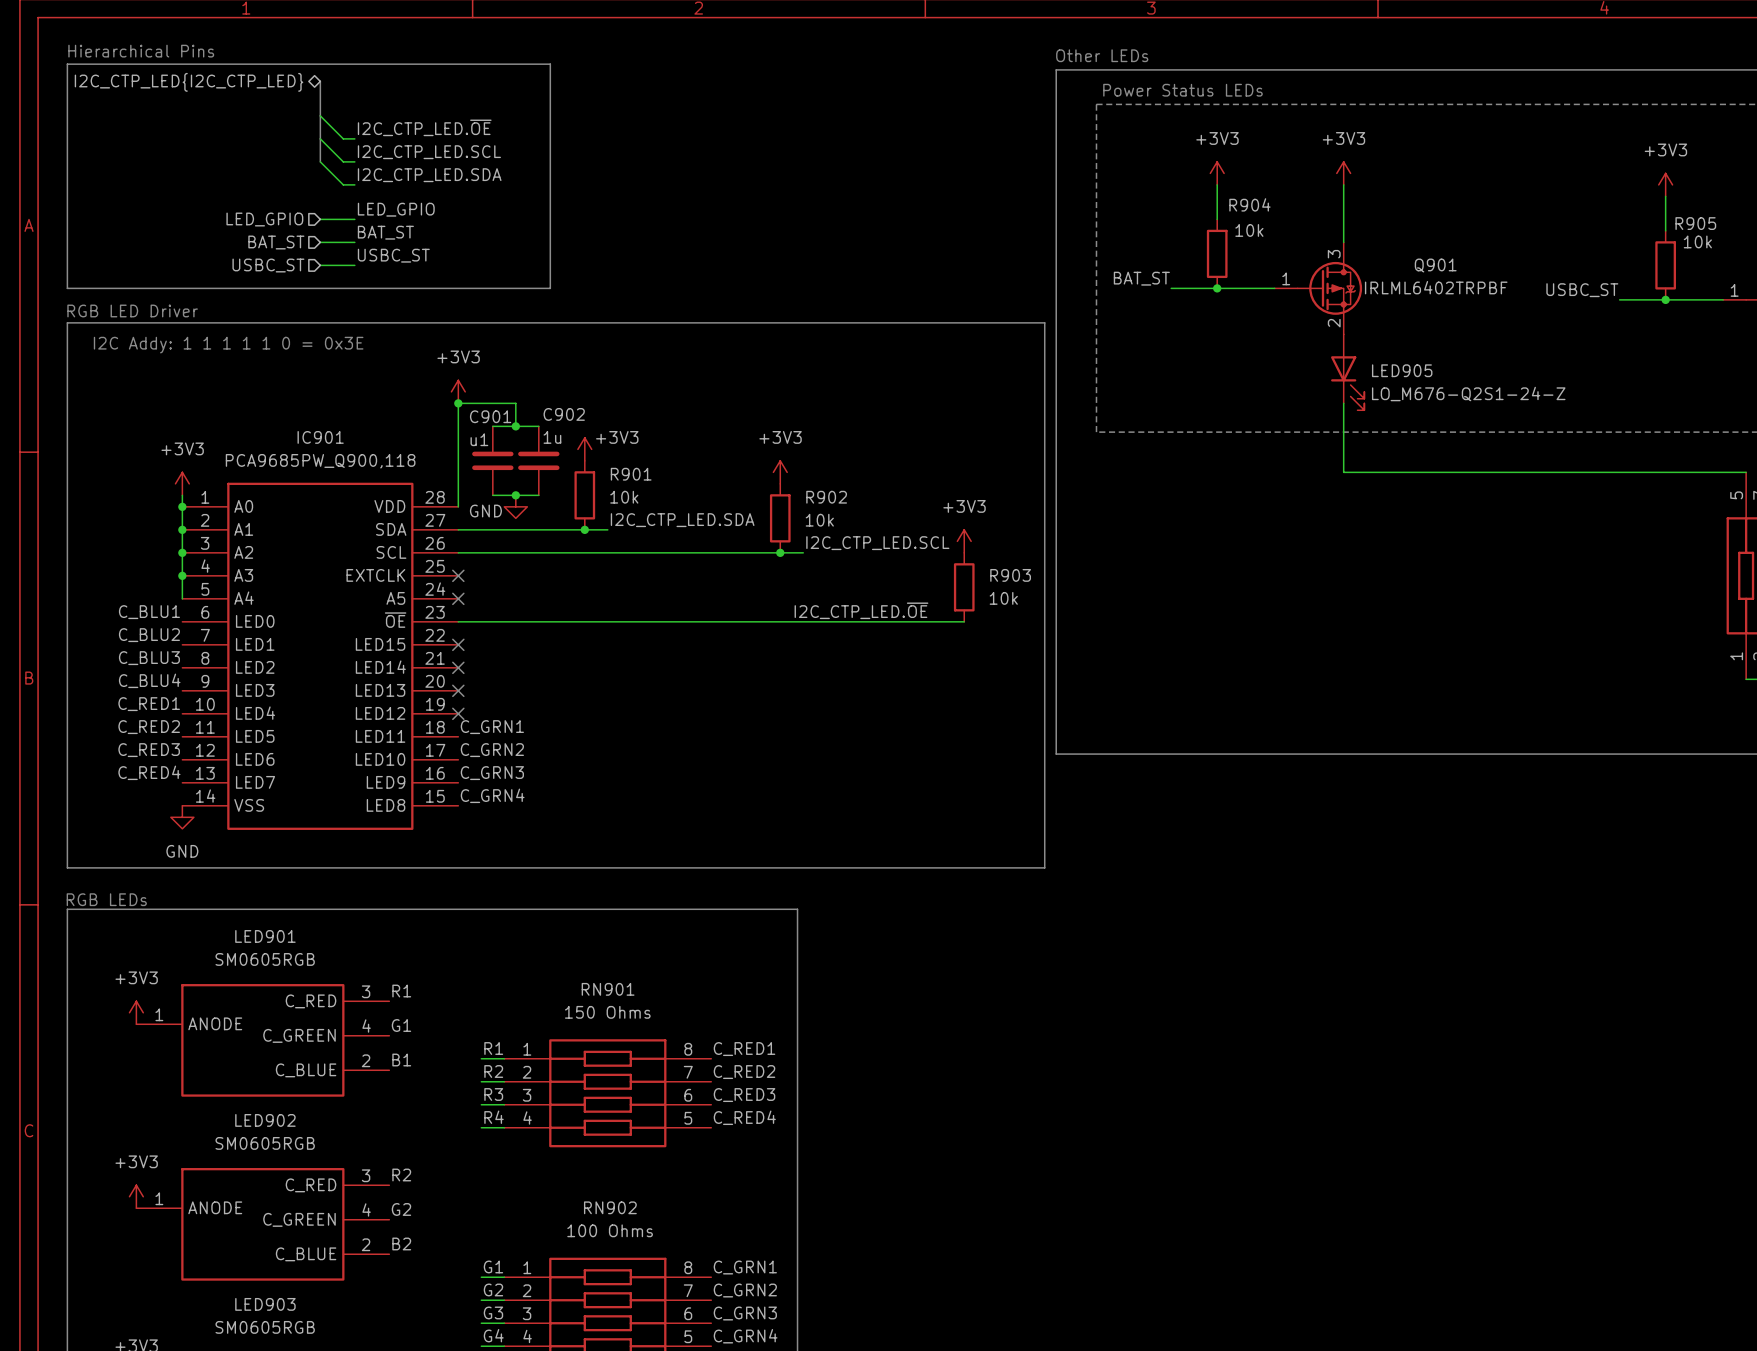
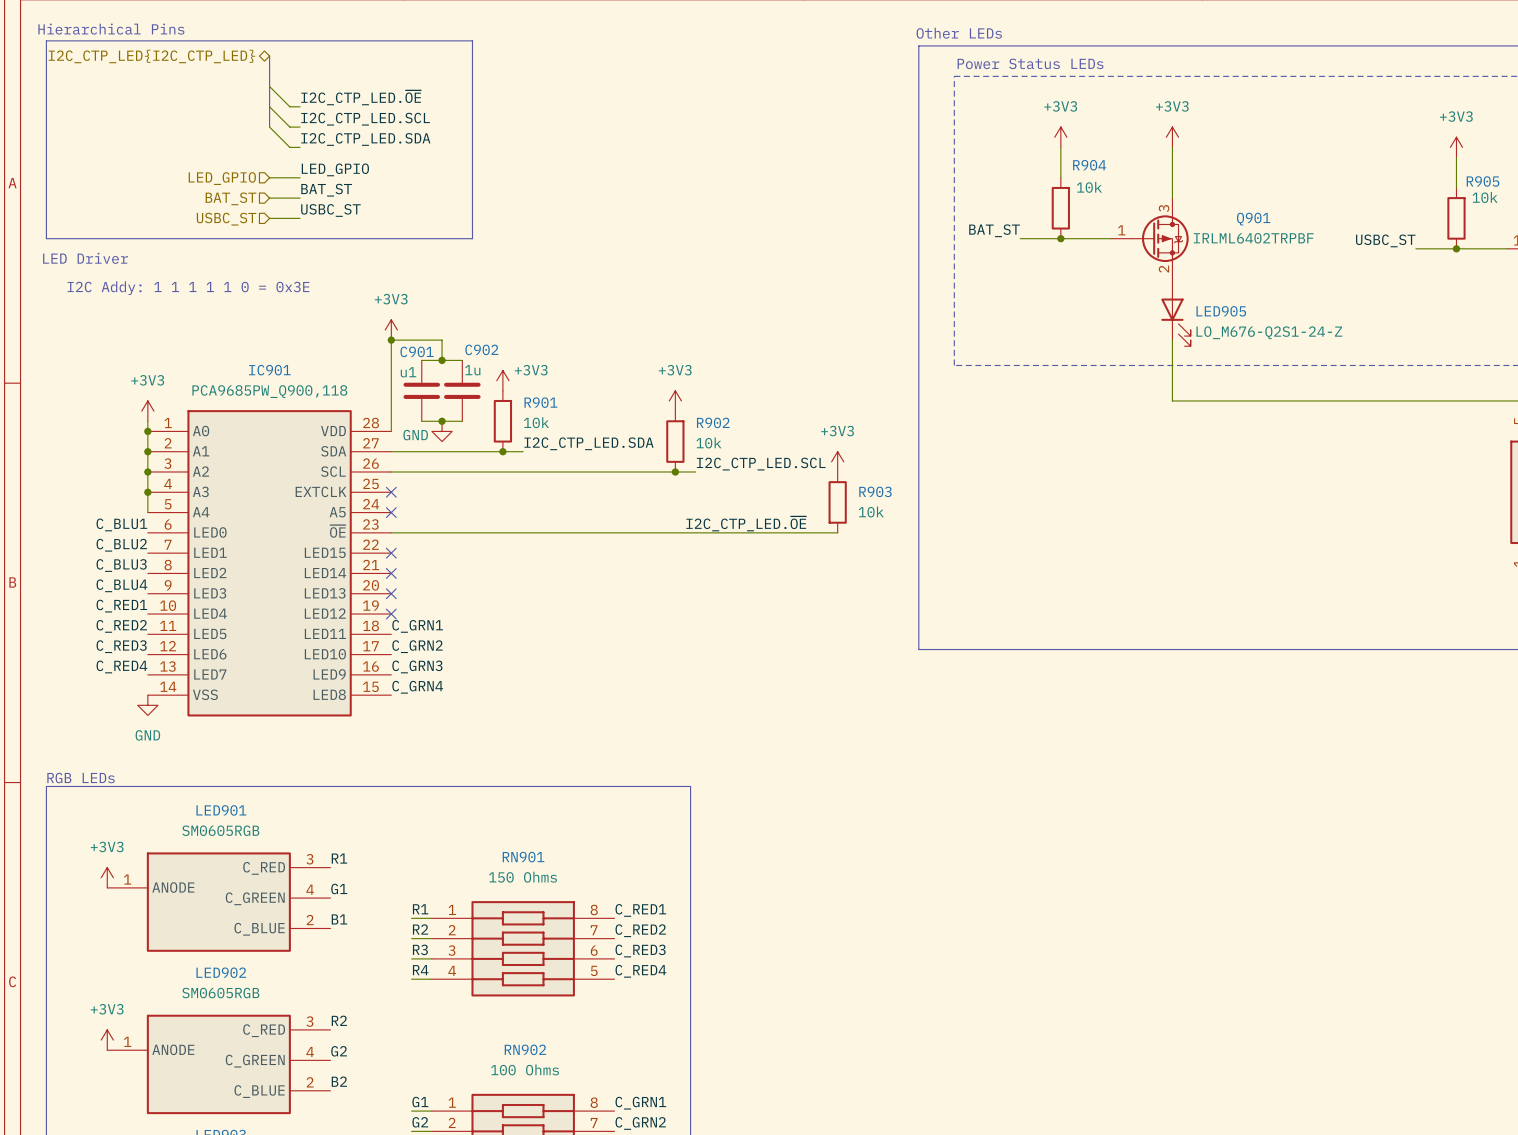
text: RGB LED Driver (132, 310) -> LED Driver (85, 258)
line: (67, 322) (1044, 322) (1044, 867) (67, 867) (67, 322) -> none

